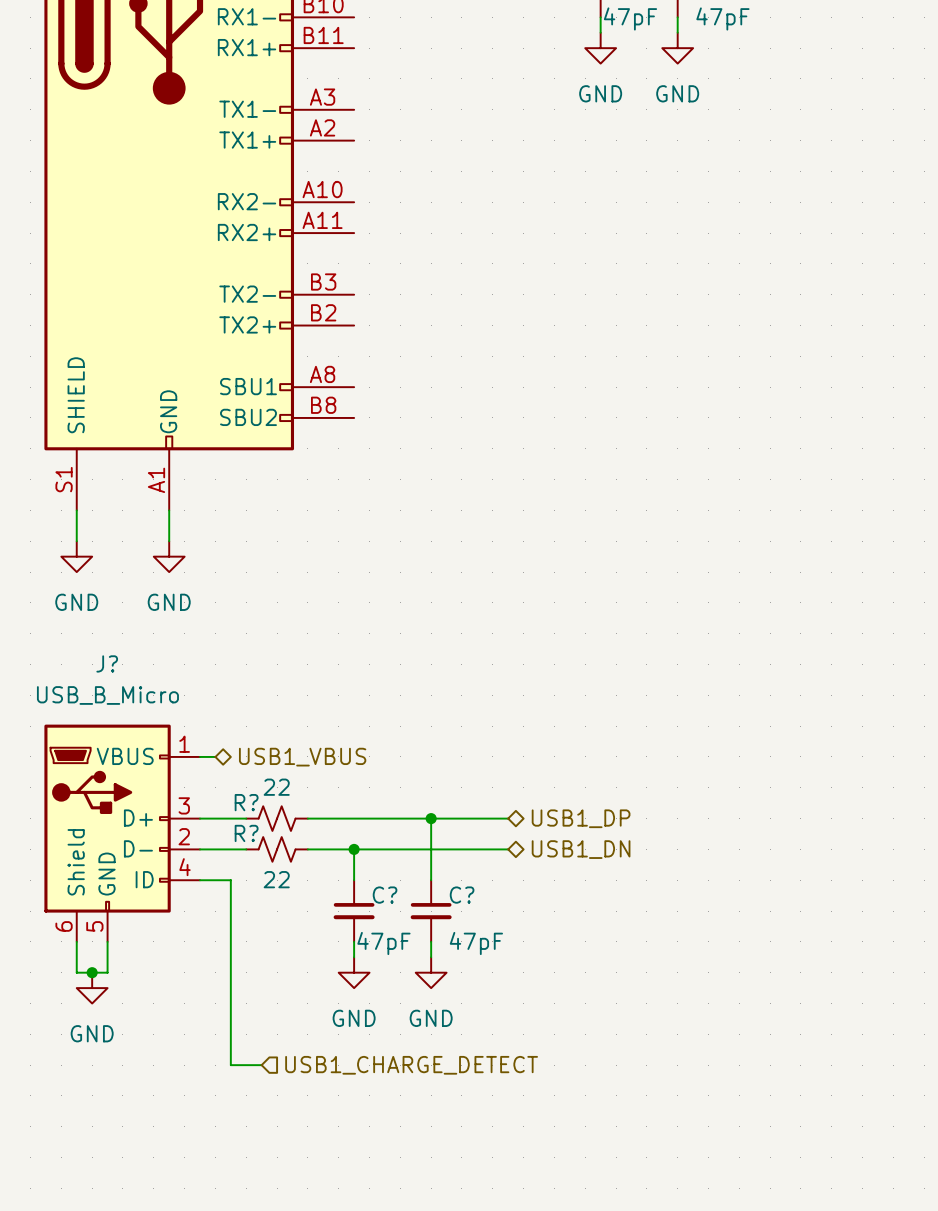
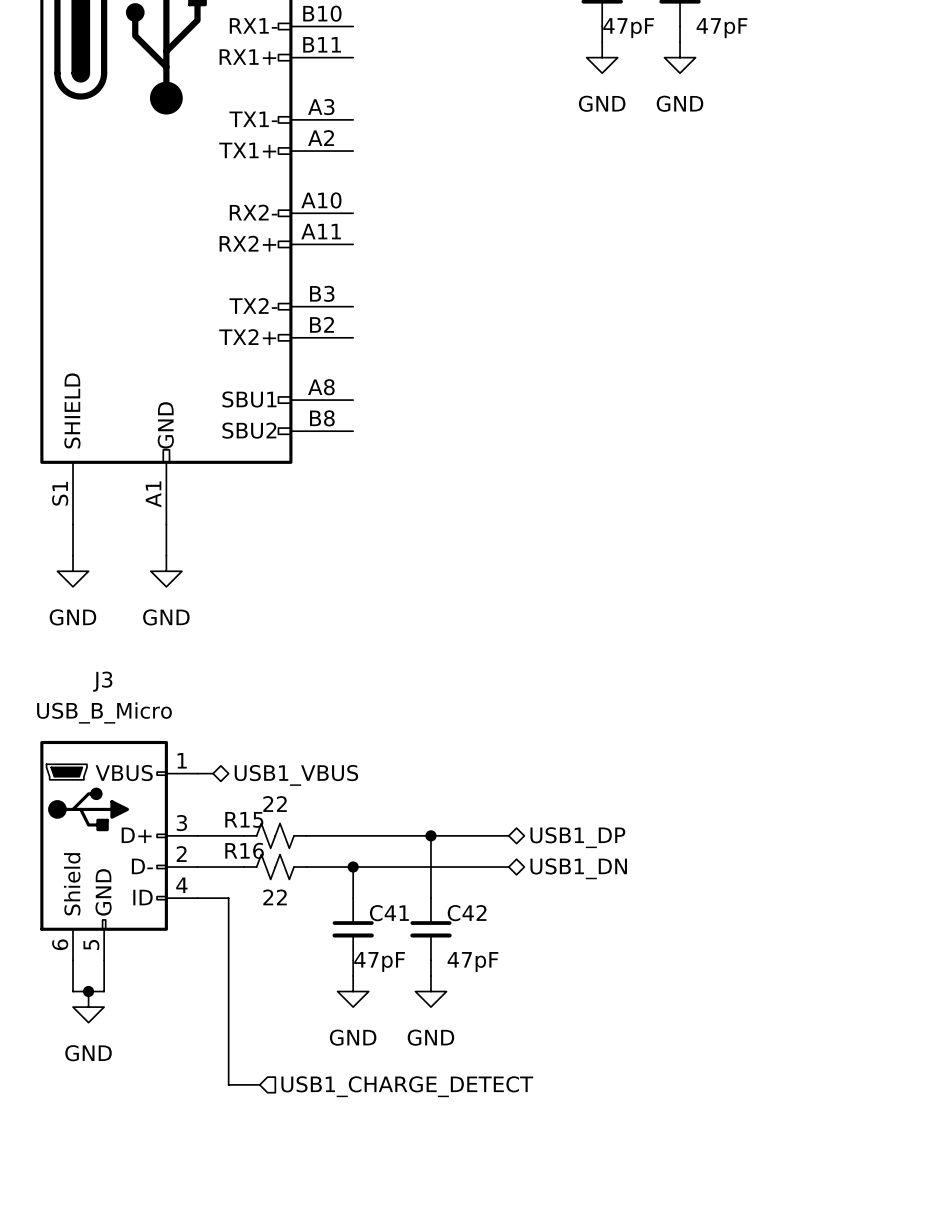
J? name: J? (107, 663) -> J3 (102, 681)
R? name: R? (246, 802) -> R15 (244, 819)
R? name: R? (246, 833) -> R16 (244, 850)
C? name: C? (385, 895) -> C41 (389, 913)
C? name: C? (462, 895) -> C42 (467, 913)

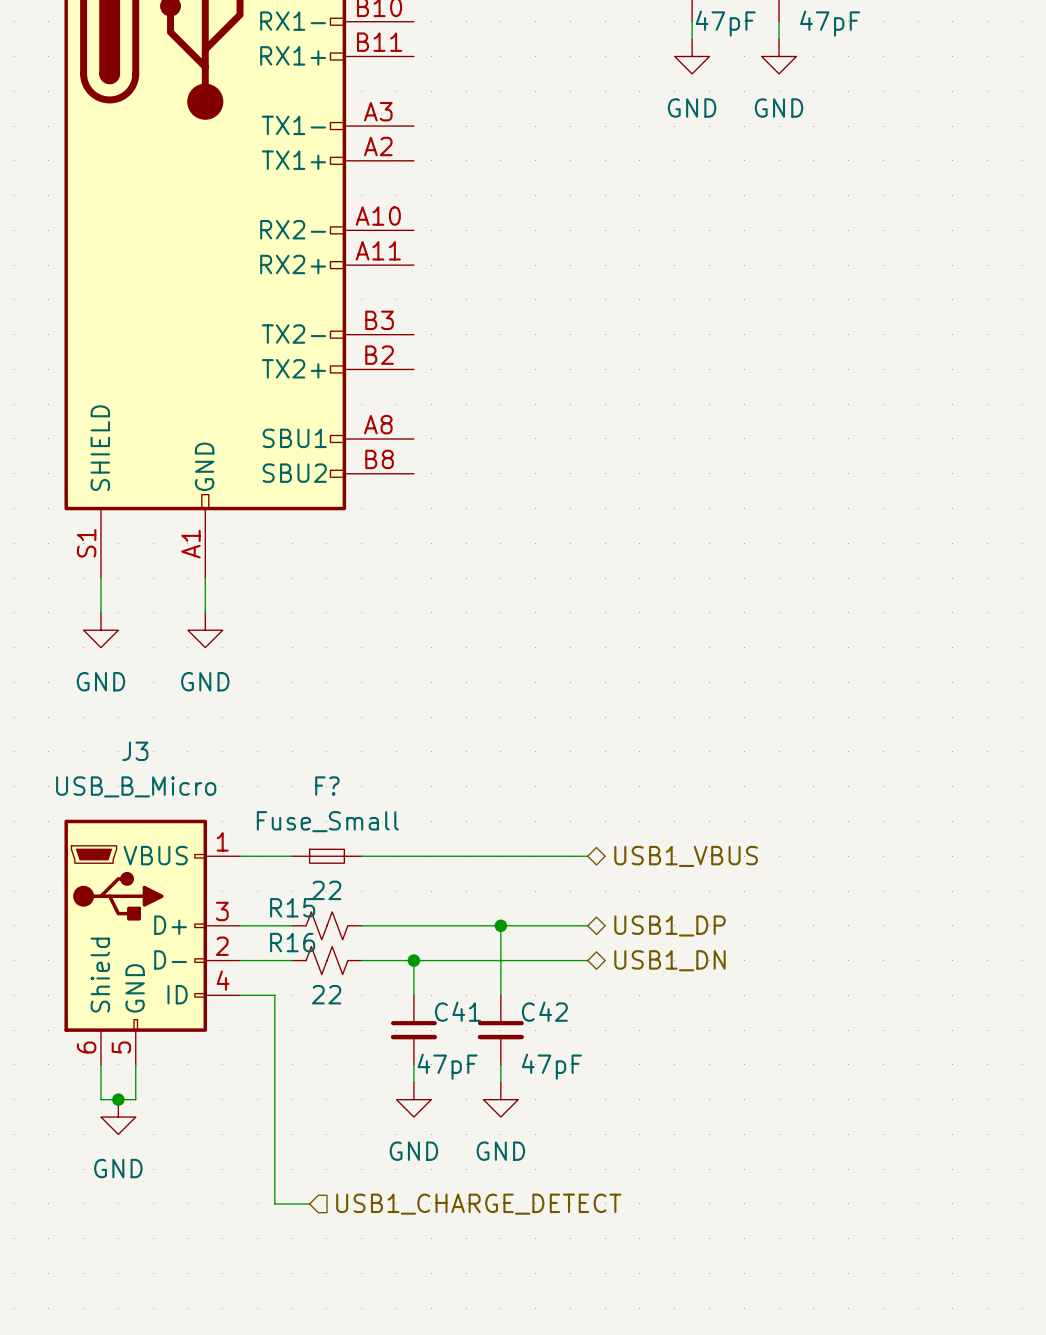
wire: none -> (257, 856) (292, 856)
F?: none -> Fuse_Small (326, 856)
wire: none -> (361, 856) (587, 856)
hierarchical label position: USB1_VBUS (296, 775) -> USB1_VBUS (686, 856)

